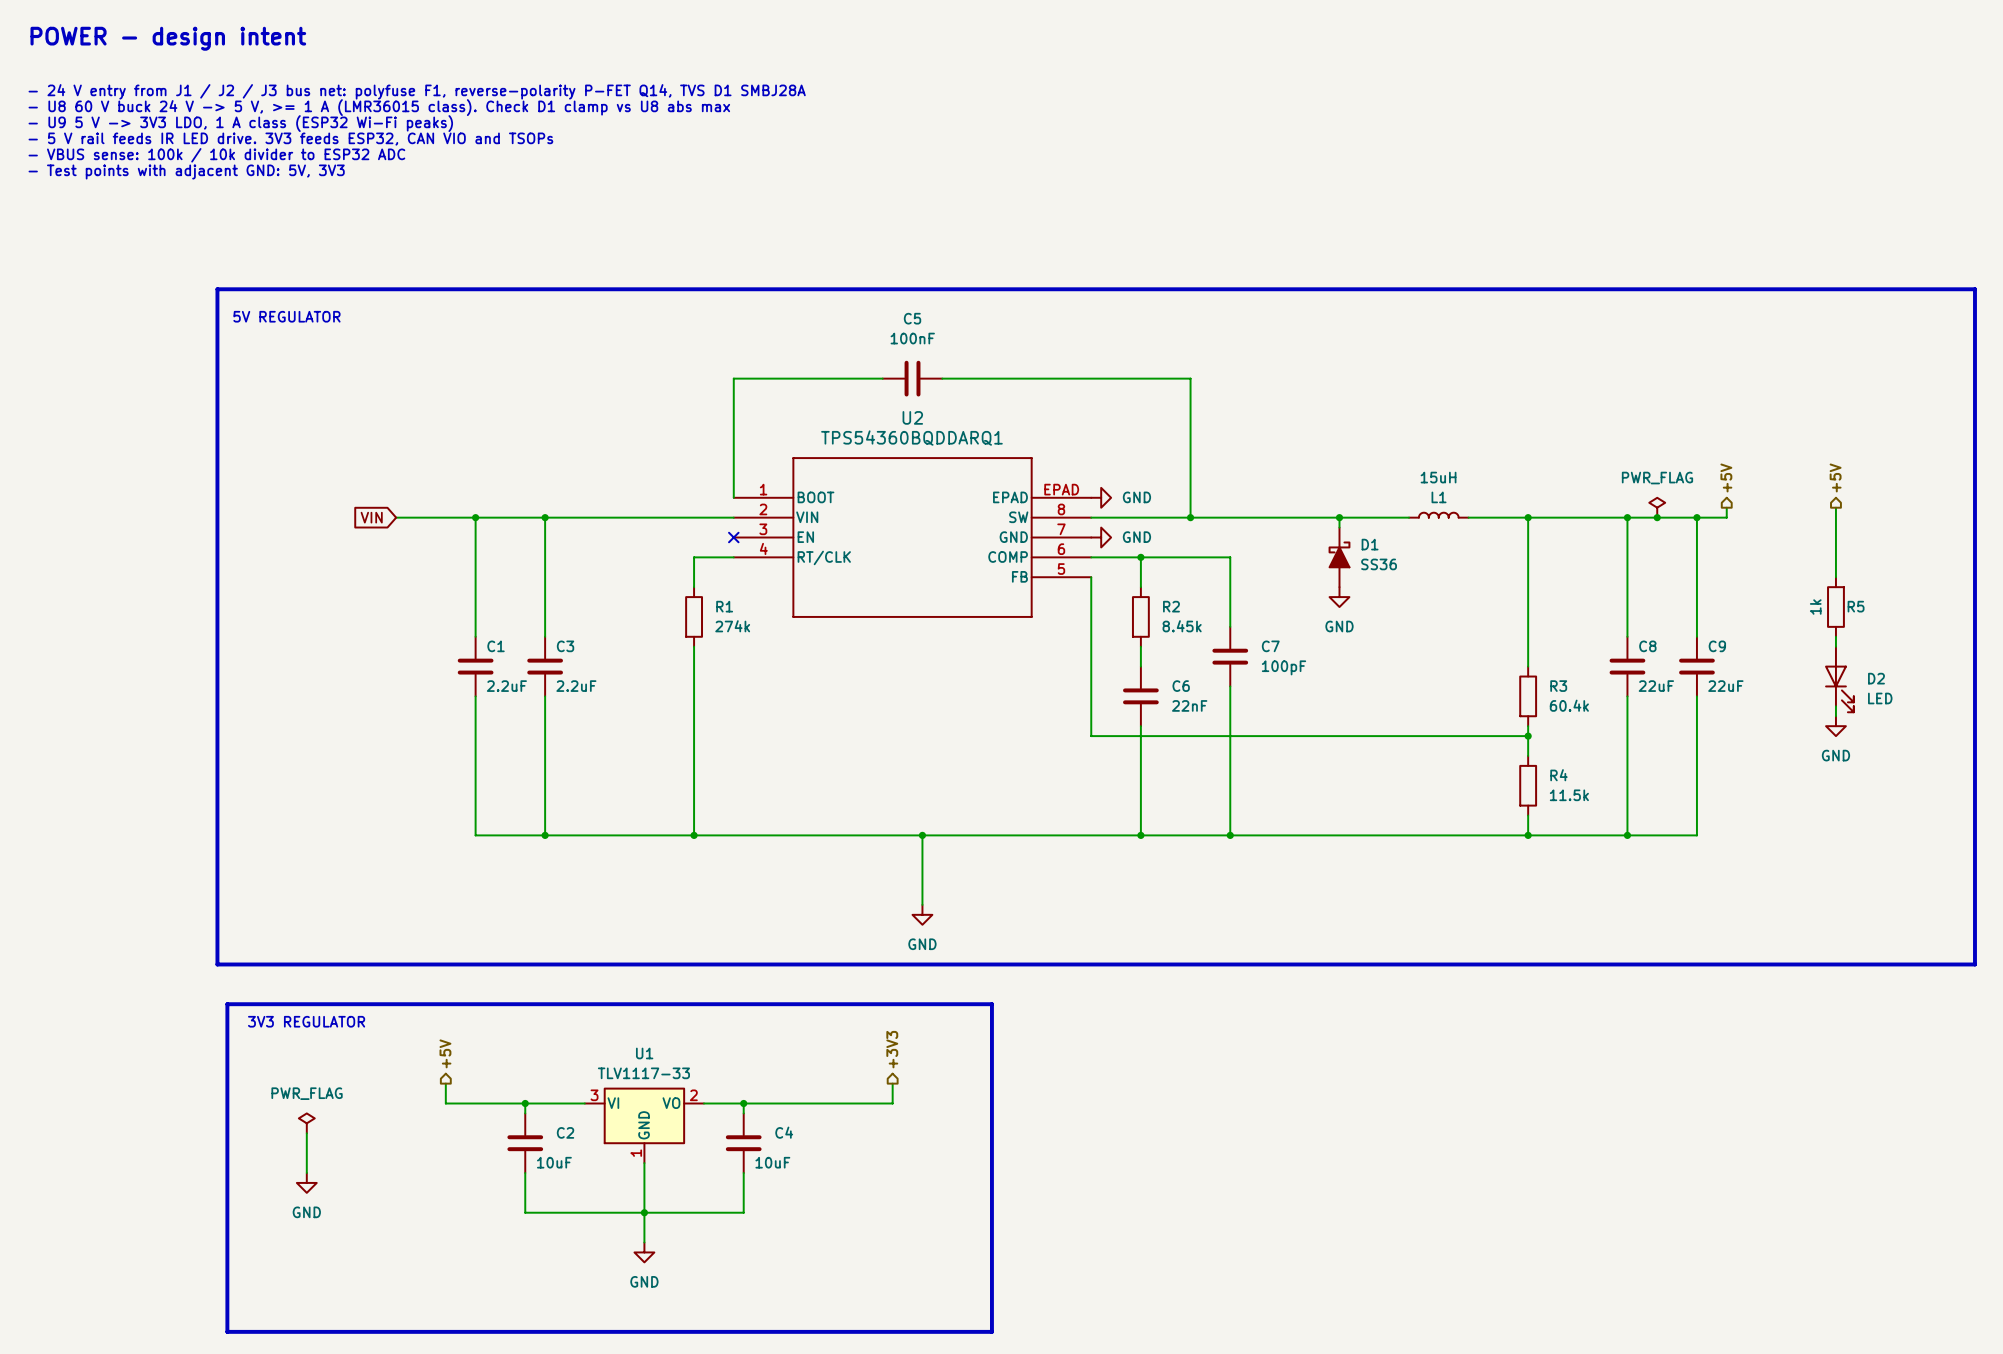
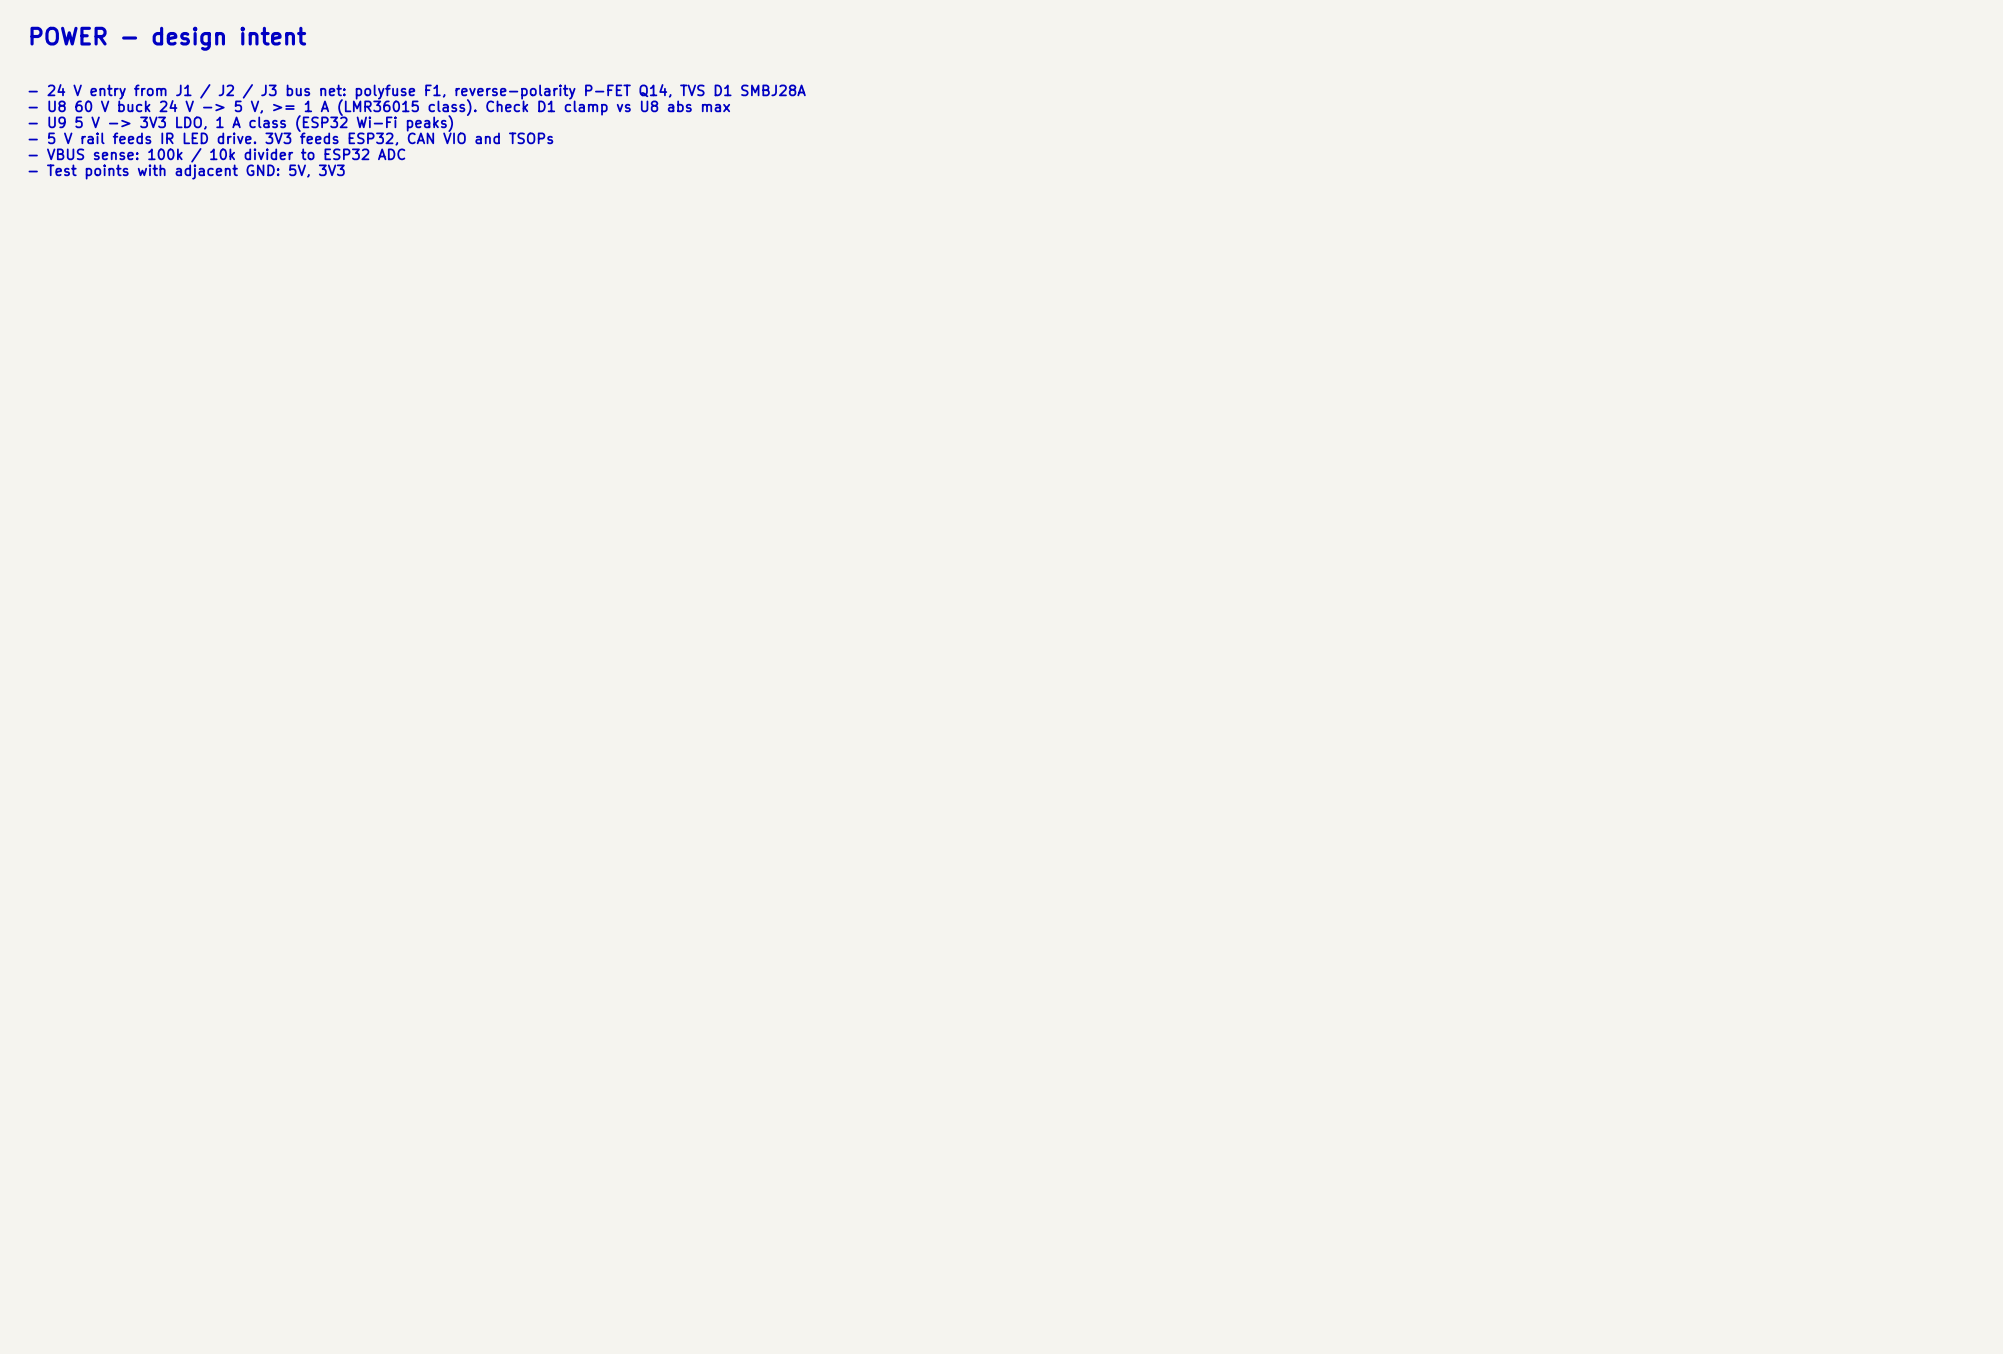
line: (217, 289) (1974, 289) (1974, 964) (217, 964) (217, 289) -> none
text: 5V REGULATOR (286, 316) -> none
wire: (882, 378) (733, 378) (733, 497) -> none
C5: 100nF (912, 378) -> none
wire: (942, 378) (1190, 378) (1190, 517) -> none
hierarchical label: +5V (1726, 477) -> none
hierarchical label: +5V (1835, 477) -> none
power symbol: GND (1101, 497) -> none
power symbol: PWR_FLAG (1657, 507) -> none
wire: (1726, 507) (1726, 517) (1468, 517) -> none
wire: (1835, 507) (1835, 577) -> none
L1: 15uH (1438, 515) -> none
global label: VIN (371, 517) -> none
wire: (396, 517) (733, 517) -> none
wire: (475, 517) (475, 636) -> none
junction: (475, 517) -> none
wire: (545, 517) (545, 636) -> none
junction: (545, 517) -> none
wire: (1091, 517) (1409, 517) -> none
junction: (1190, 517) -> none
wire: (1339, 517) (1339, 527) -> none
junction: (1339, 517) -> none
wire: (1528, 517) (1528, 666) -> none
junction: (1528, 517) -> none
wire: (1627, 517) (1627, 636) -> none
junction: (1627, 517) -> none
junction: (1657, 517) -> none
wire: (1696, 517) (1696, 636) -> none
junction: (1696, 517) -> none
no-connect mark: (733, 537) -> none
U2: TPS54360BQDDARQ1 (912, 537) -> none
power symbol: GND (1101, 537) -> none
wire: (733, 557) (694, 557) (694, 587) -> none
wire: (1091, 557) (1230, 557) (1230, 626) -> none
wire: (1140, 557) (1140, 587) -> none
junction: (1140, 557) -> none
D1: SS36 (1339, 557) -> none
wire: (1091, 577) (1091, 736) (1528, 736) -> none
power symbol: GND (1339, 597) -> none
R5: 1k (1835, 607) -> none
R1: 274k (694, 616) -> none
R2: 8.45k (1140, 616) -> none
wire: (1835, 636) (1835, 646) -> none
wire: (694, 646) (694, 835) -> none
wire: (1140, 646) (1140, 666) -> none
C7: 100pF (1230, 656) -> none
C1: 2.2uF (475, 666) -> none
C3: 2.2uF (545, 666) -> none
C8: 22uF (1627, 666) -> none
C9: 22uF (1696, 666) -> none
D2: LED (1839, 679) -> none
wire: (1230, 686) (1230, 835) -> none
wire: (475, 696) (475, 835) (1696, 835) (1696, 696) -> none
wire: (545, 696) (545, 835) -> none
C6: 22nF (1140, 696) -> none
R3: 60.4k (1528, 696) -> none
wire: (1627, 696) (1627, 835) -> none
wire: (1835, 706) (1835, 716) -> none
wire: (1140, 726) (1140, 835) -> none
wire: (1528, 726) (1528, 755) -> none
power symbol: GND (1835, 726) -> none
junction: (1528, 736) -> none
R4: 11.5k (1528, 785) -> none
wire: (1528, 815) (1528, 835) -> none
junction: (545, 835) -> none
junction: (694, 835) -> none
wire: (922, 835) (922, 904) -> none
junction: (922, 835) -> none
junction: (1140, 835) -> none
junction: (1230, 835) -> none
junction: (1528, 835) -> none
junction: (1627, 835) -> none
power symbol: GND (922, 914) -> none
line: (227, 1004) (991, 1004) (991, 1331) (227, 1331) (227, 1004) -> none
text: 3V3 REGULATOR (306, 1021) -> none
hierarchical label: +3V3 (892, 1049) -> none
hierarchical label: +5V (445, 1053) -> none
wire: (445, 1083) (445, 1103) (584, 1103) -> none
wire: (892, 1083) (892, 1103) (703, 1103) -> none
wire: (525, 1103) (525, 1113) -> none
junction: (525, 1103) -> none
wire: (743, 1103) (743, 1113) -> none
junction: (743, 1103) -> none
power symbol: PWR_FLAG (306, 1123) -> none
U1: TLV1117-33 (644, 1125) -> none
wire: (306, 1133) (306, 1173) -> none
C2: 10uF (525, 1143) -> none
C4: 10uF (743, 1143) -> none
wire: (644, 1163) (644, 1242) -> none
wire: (525, 1173) (525, 1212) (743, 1212) (743, 1173) -> none
power symbol: GND (306, 1182) -> none
junction: (644, 1212) -> none
power symbol: GND (644, 1252) -> none

